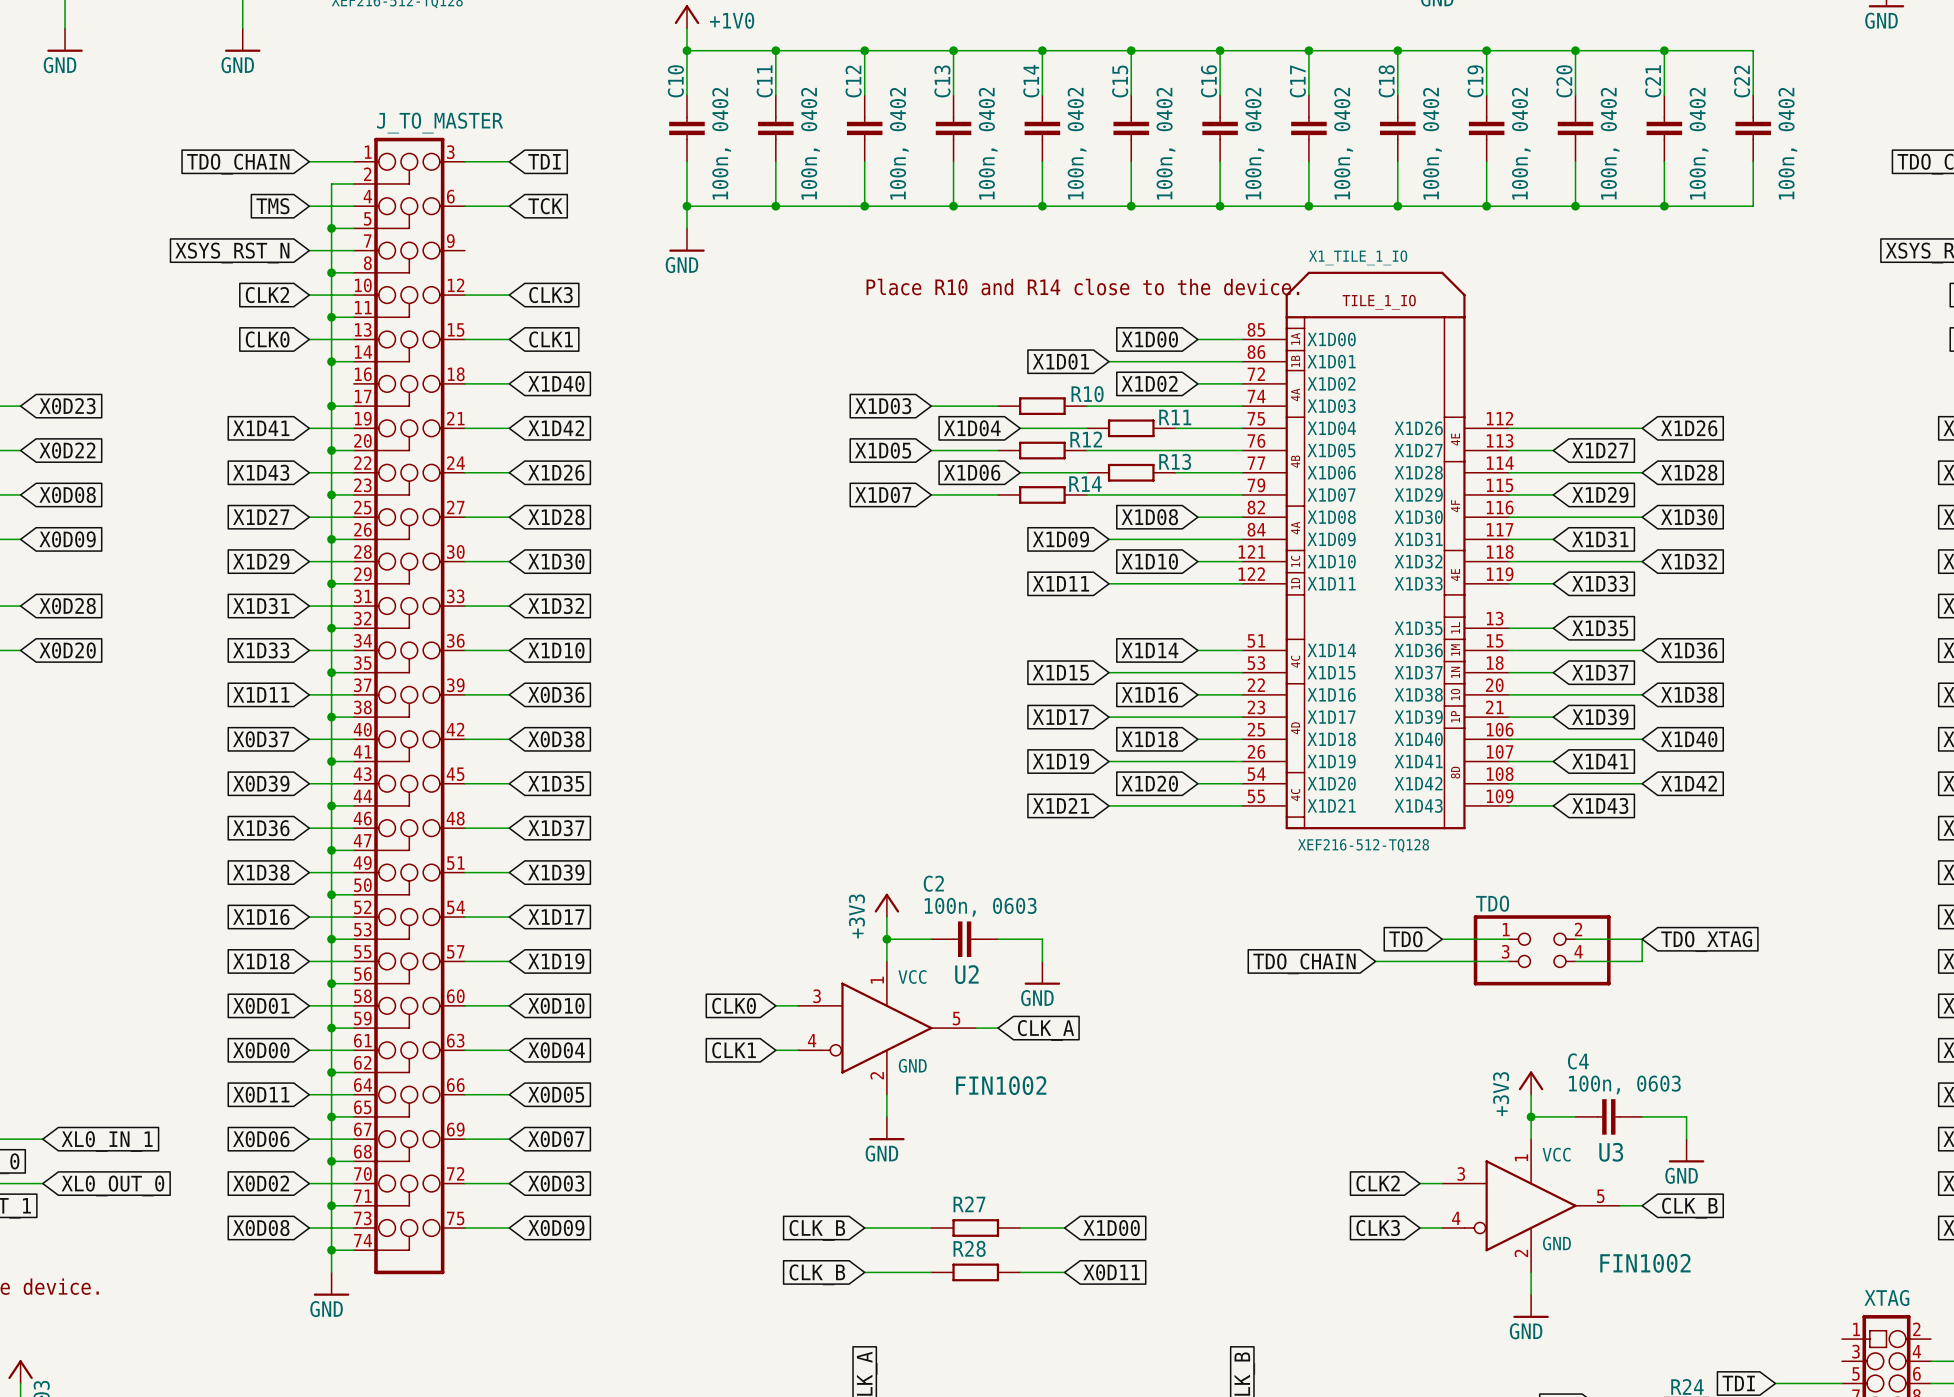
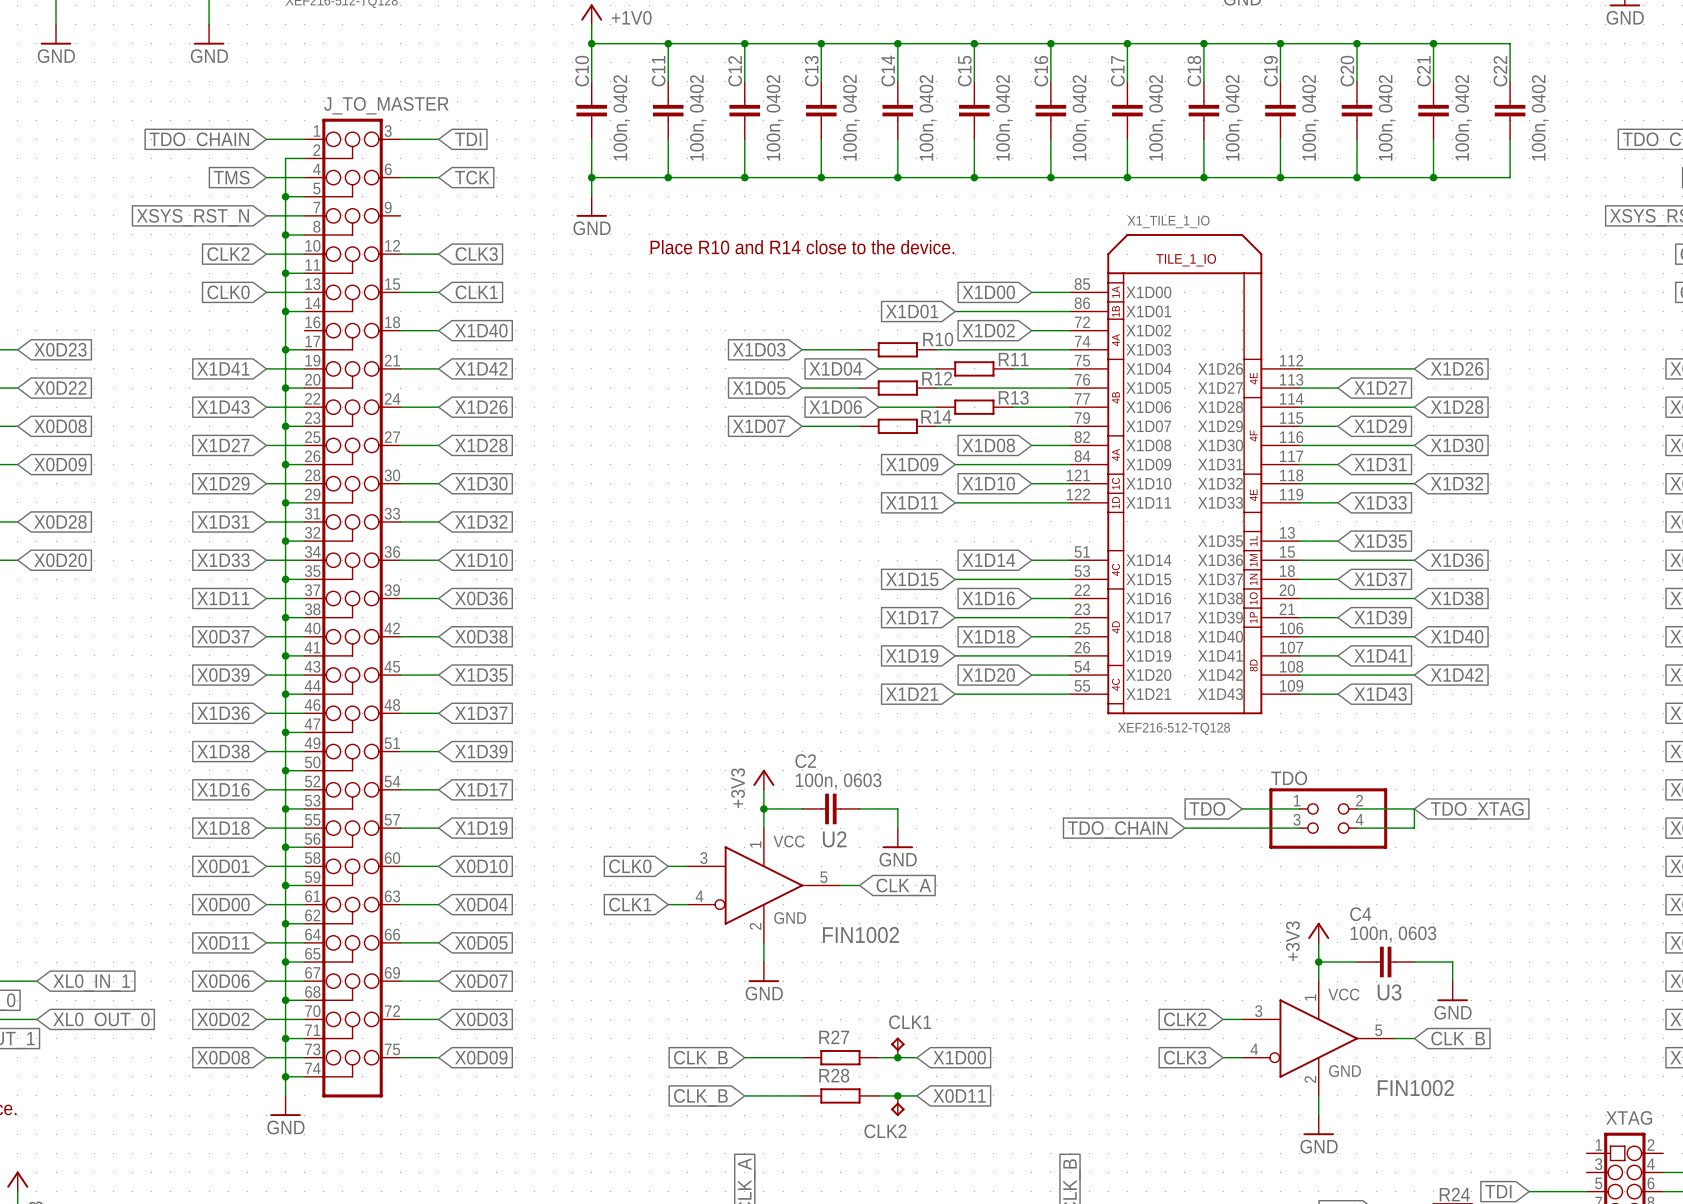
text position: Place R10 and R14 close to the device. (1082, 287) -> Place R10 and R14 close to the device. (802, 247)
CLK1: none -> (897, 1047)
junction: none -> (897, 1057)
junction: none -> (897, 1095)
CLK2: none -> (897, 1105)

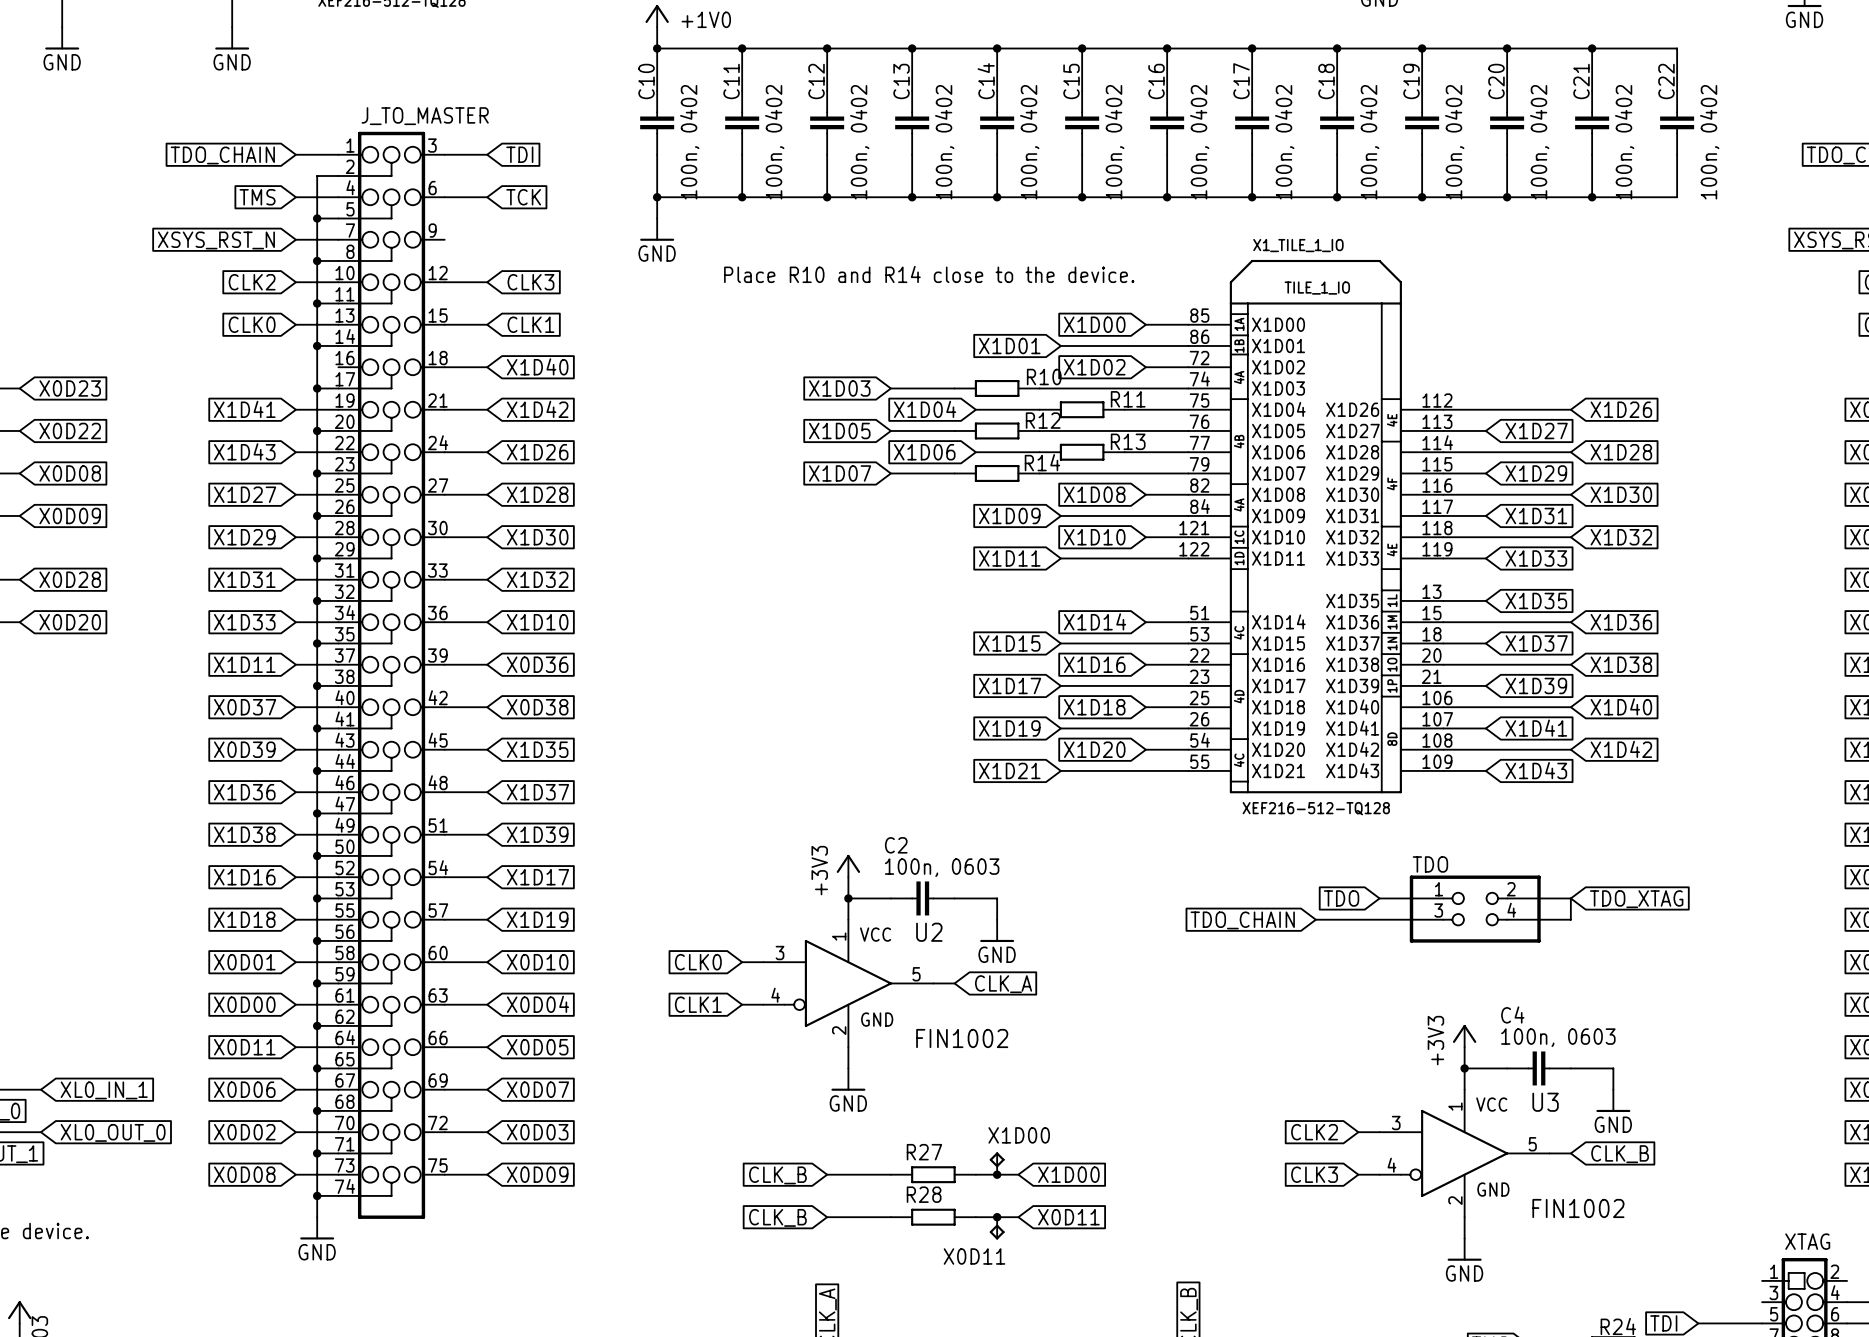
CLK1 name: CLK1 (910, 1022) -> X1D00 (1019, 1135)
CLK2 name: CLK2 (885, 1131) -> X0D11 (974, 1256)

